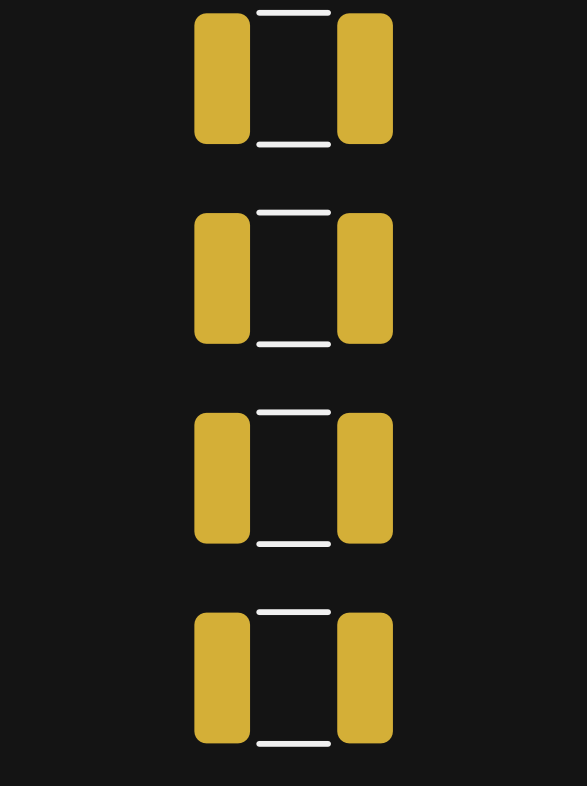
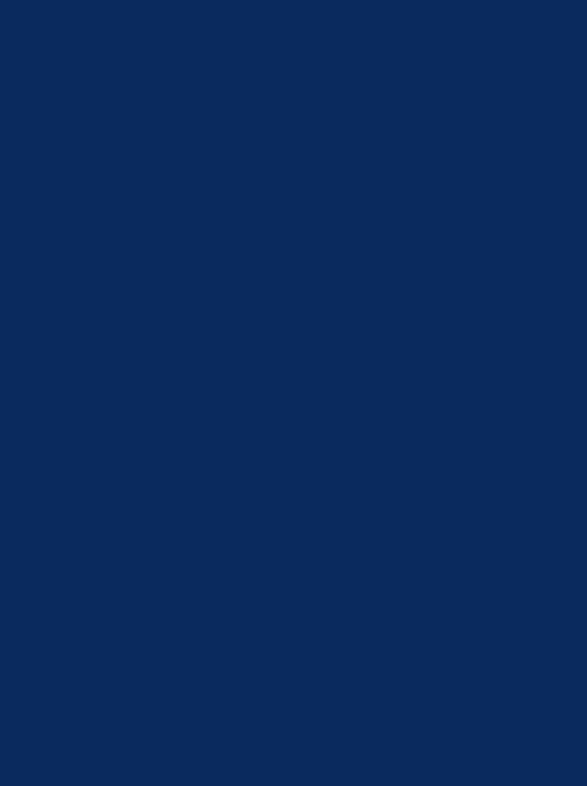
part: (293, 78) -> none
part: (293, 278) -> none
part: (293, 478) -> none
part: (293, 678) -> none

